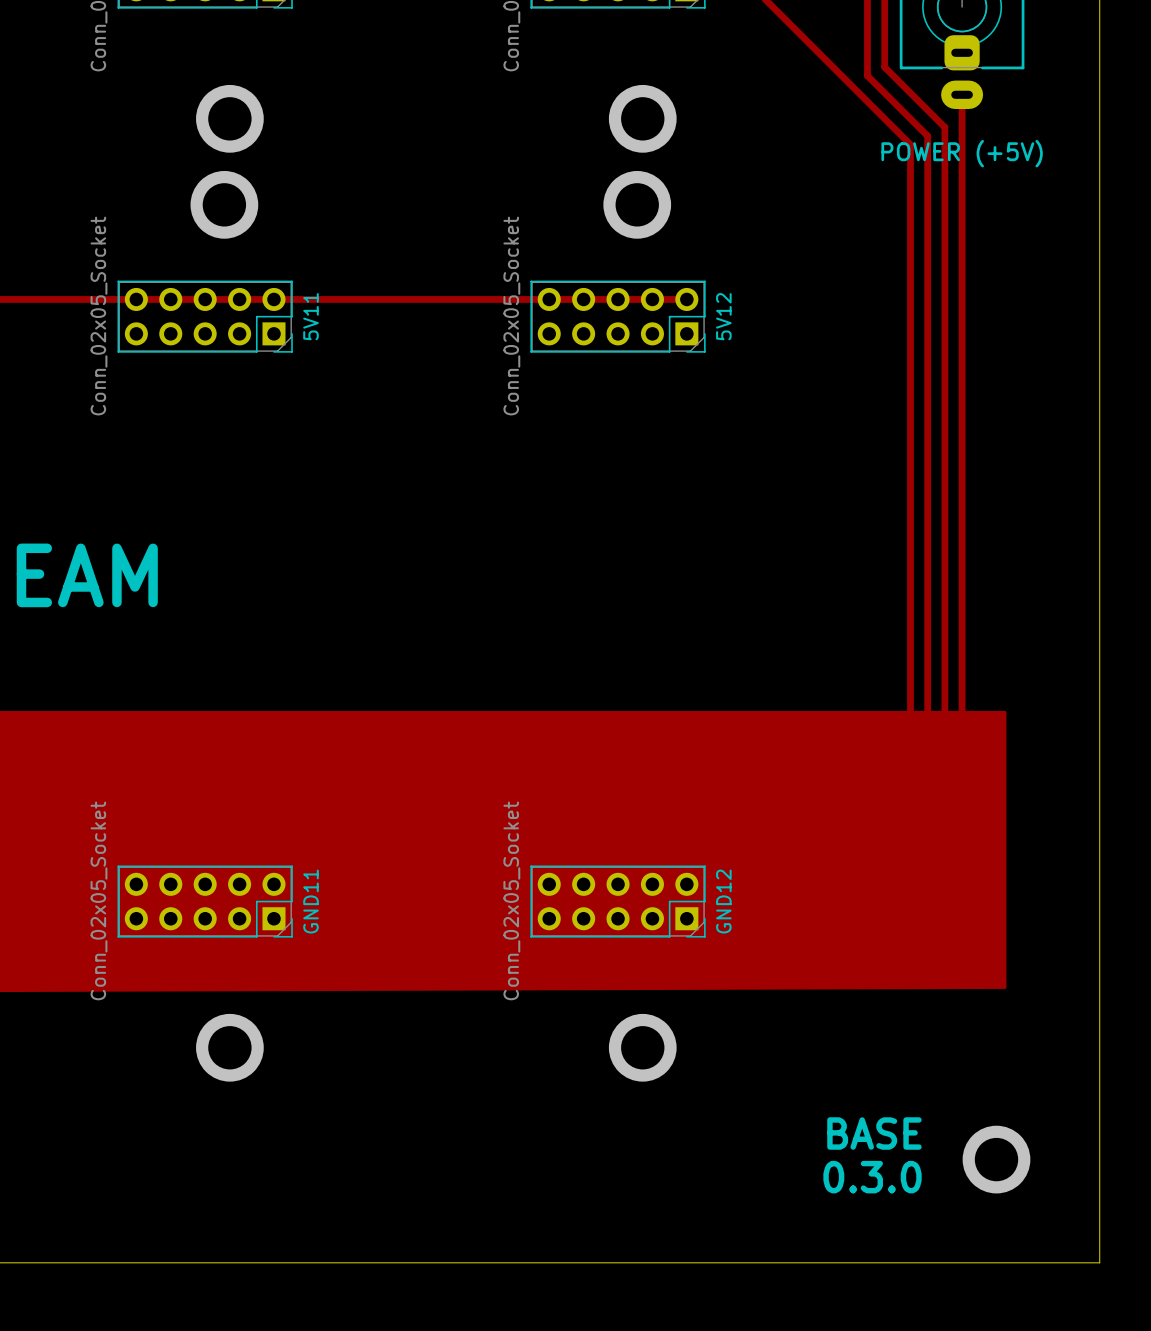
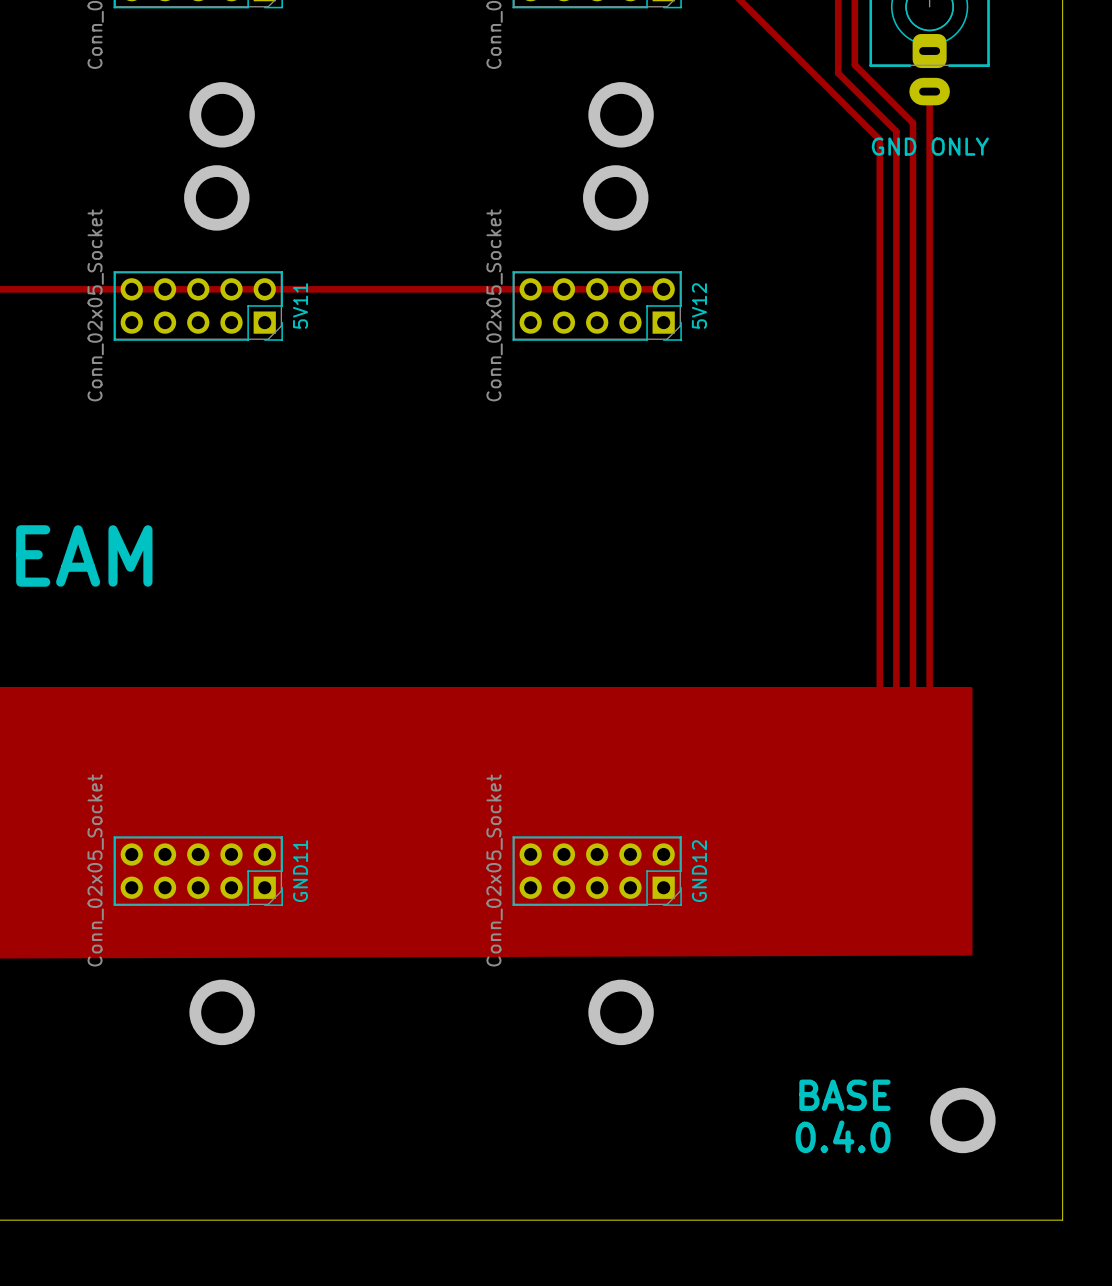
text: POWER (+5V) (962, 153) -> GND ONLY (930, 146)
text: 0.3.0 (872, 1177) -> 0.4.0 (843, 1136)

